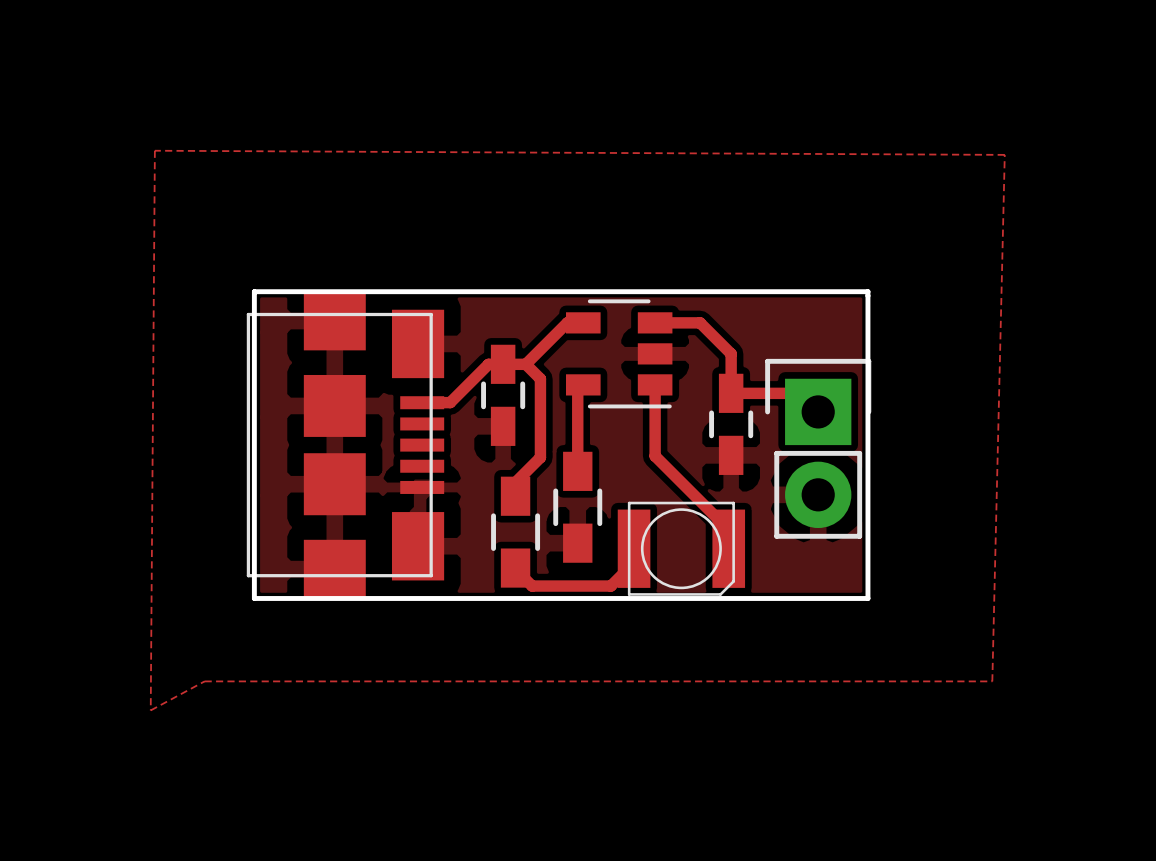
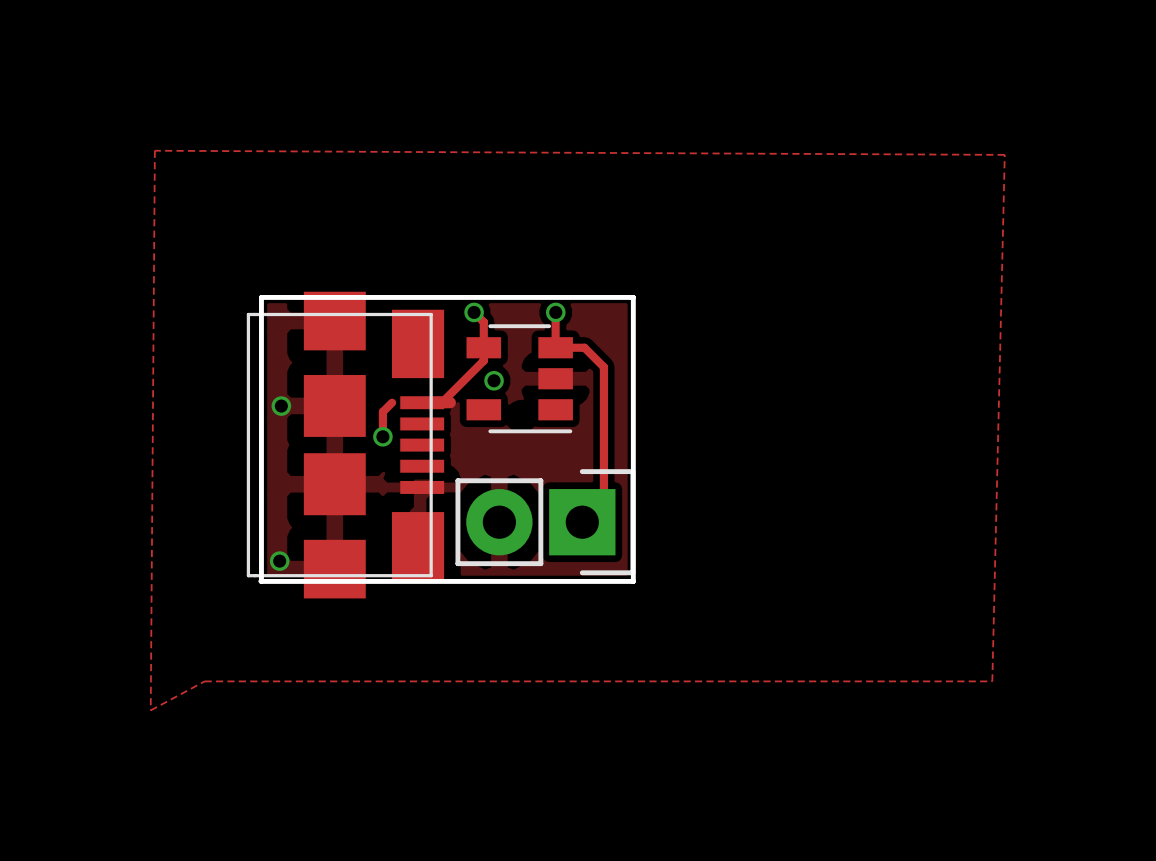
board edge: (254, 291) (254, 598) (867, 598) (867, 291) (254, 291) -> (261, 581) (633, 581) (633, 297) (261, 297) (261, 581)
track: none -> (474, 312) (483, 322) (483, 360) (441, 402)
via: none -> (474, 312)
track: none -> (555, 312) (555, 347) (584, 347) (603, 367) (603, 500) (582, 522)
via: none -> (555, 312)
track: (583, 322) (567, 322) (525, 364) -> none
track: (655, 322) (700, 322) (731, 353) (731, 393) (799, 393) (818, 411) -> none
part footprint: [481, 344, 526, 446] -> [466, 324, 573, 434]
part: (619, 353) -> none
track: (525, 364) (540, 378) (540, 457) (515, 482) (515, 496) -> none
track: (525, 364) (488, 364) (450, 402) -> none
via: none -> (494, 380)
track: (583, 384) (577, 390) (577, 471) -> none
track: (655, 384) (655, 456) (728, 529) (728, 548) -> none
track: none -> (392, 402) (382, 411) (382, 436)
via: none -> (281, 406)
part: (731, 424) -> none
via: none -> (382, 436)
part rotation: 0° (818, 448) -> 90° clockwise (545, 522)
part position: (818, 448) -> (545, 522)
part: (577, 507) -> none
part: (515, 532) -> none
track: (634, 548) (634, 562) (610, 586) (532, 586) (515, 568) -> none
part: (681, 548) -> none
via: none -> (279, 561)

